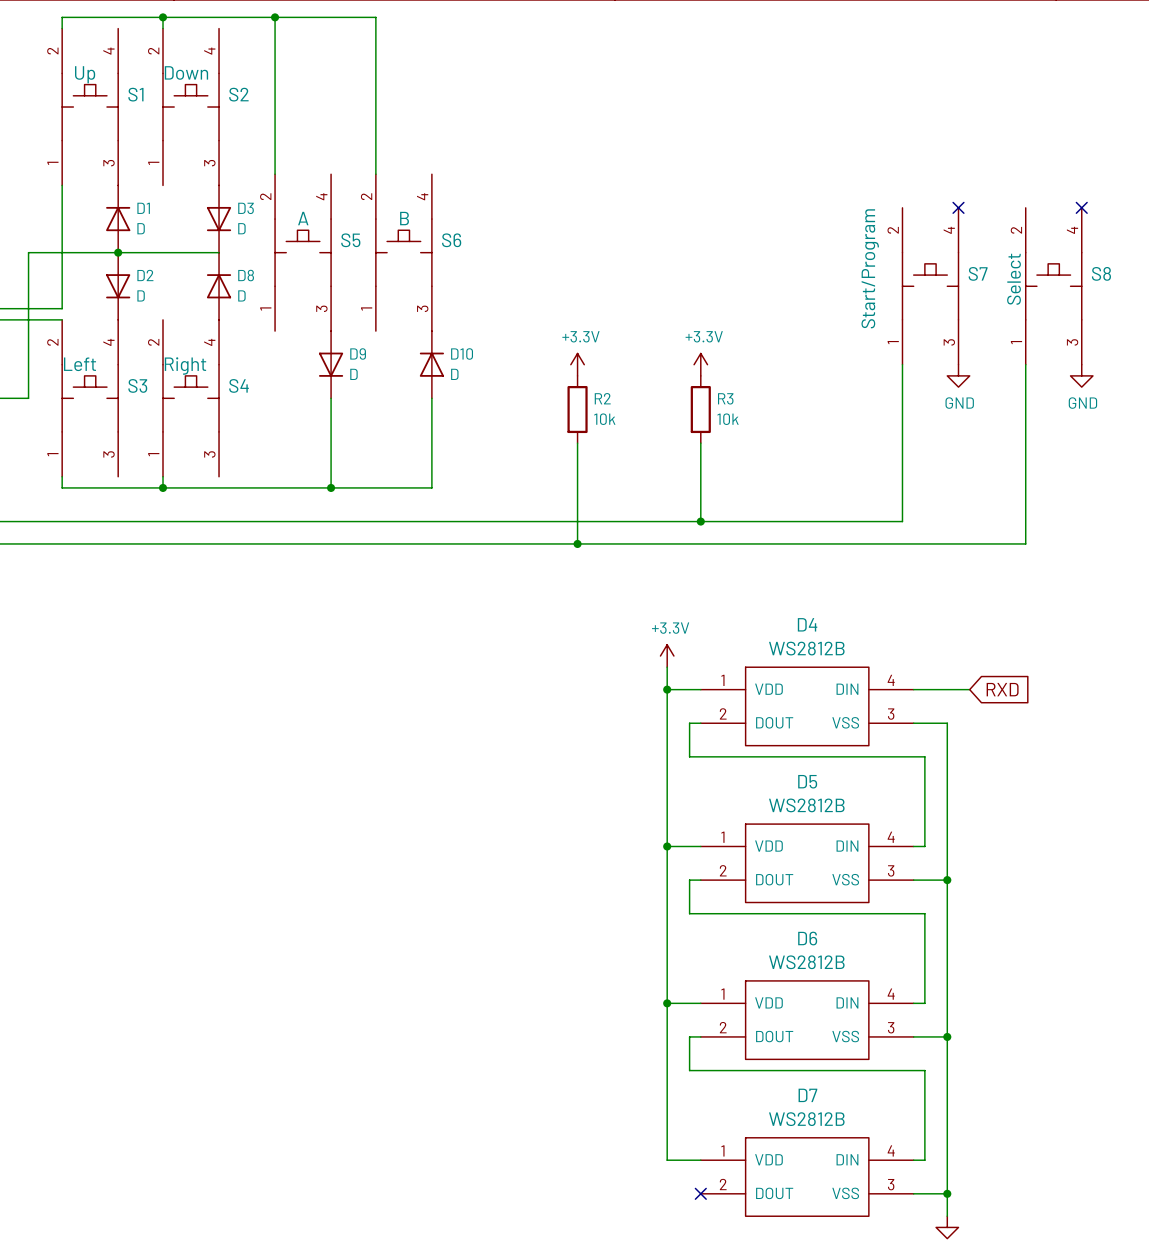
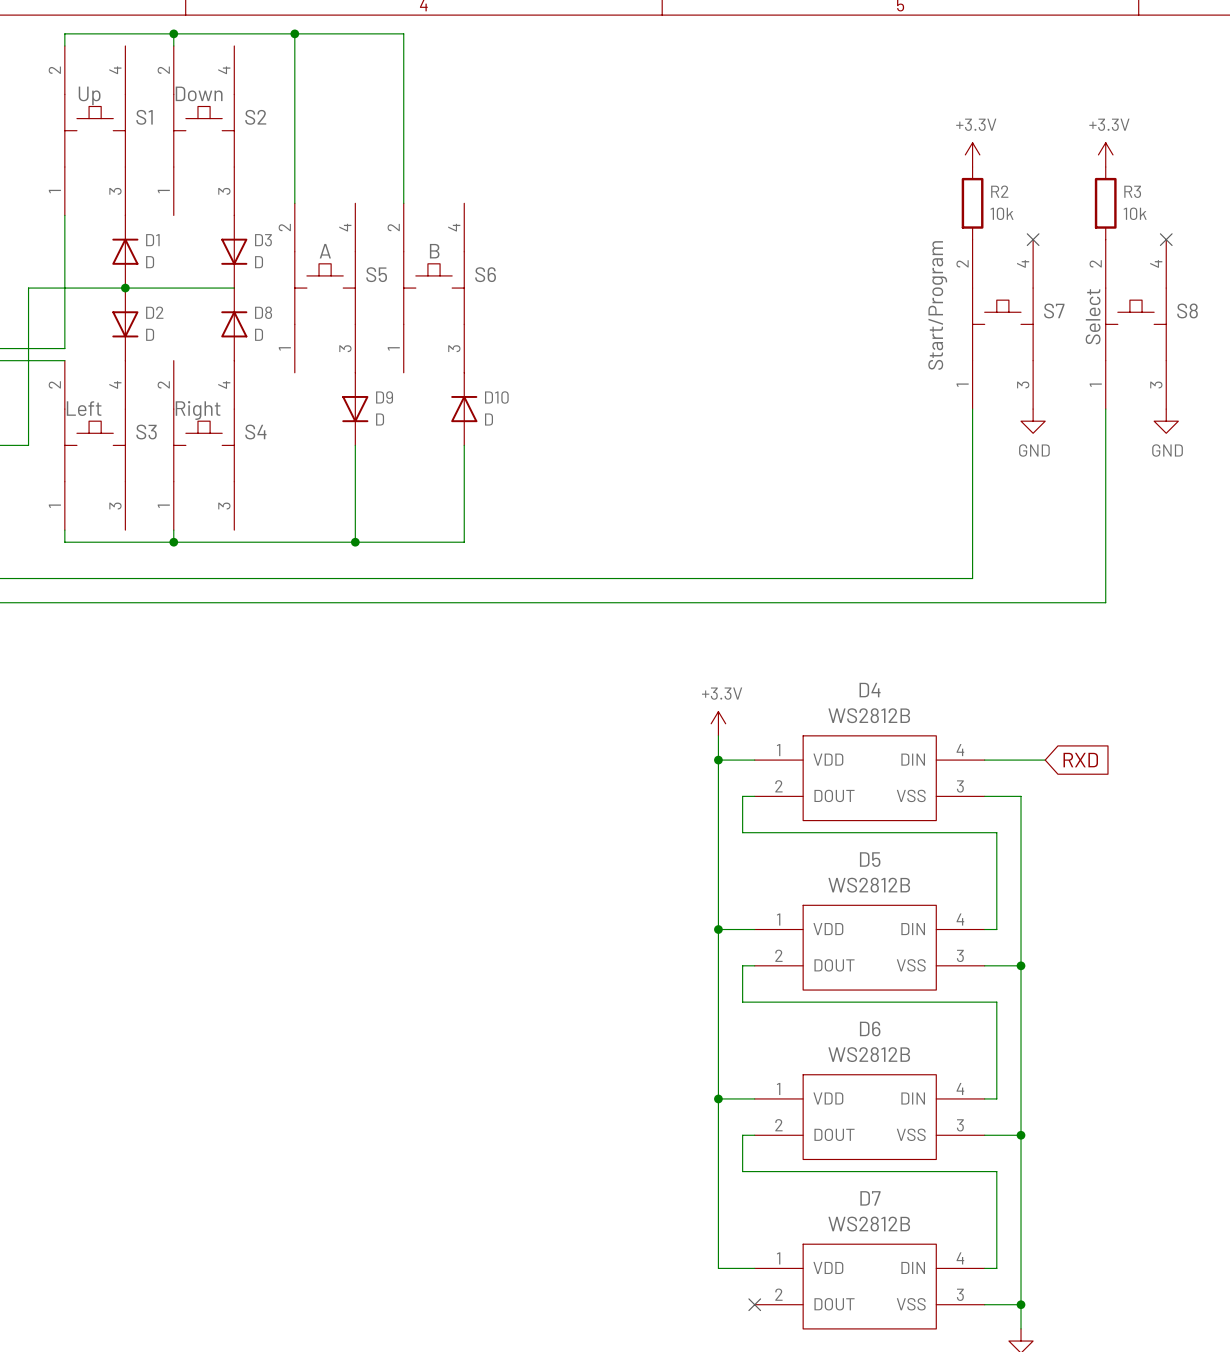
power symbol: none -> +3.3V (972, 154)
power symbol: none -> +3.3V (1105, 154)
power symbol: +3.3V (577, 364) -> none
power symbol: +3.3V (700, 364) -> none
R2 position: (577, 409) -> (972, 203)
R3 position: (700, 409) -> (1105, 203)
wire: (577, 443) (577, 543) -> none
wire: (700, 443) (700, 521) -> none
junction: (700, 521) -> none
junction: (577, 543) -> none

